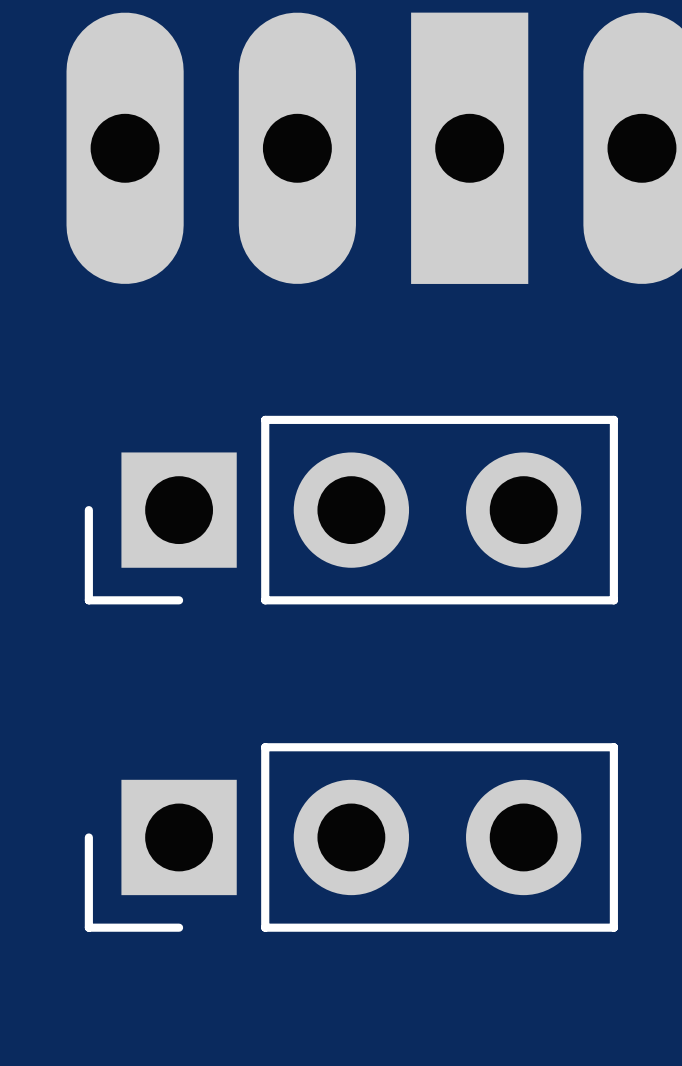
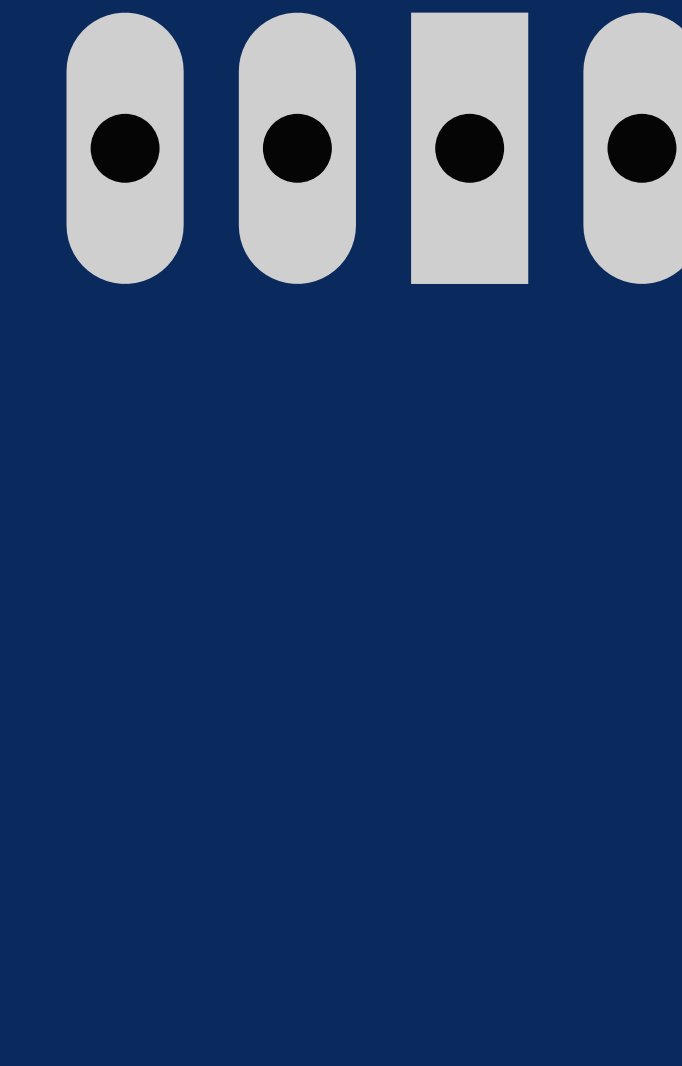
part: (351, 510) -> none
part: (351, 837) -> none

